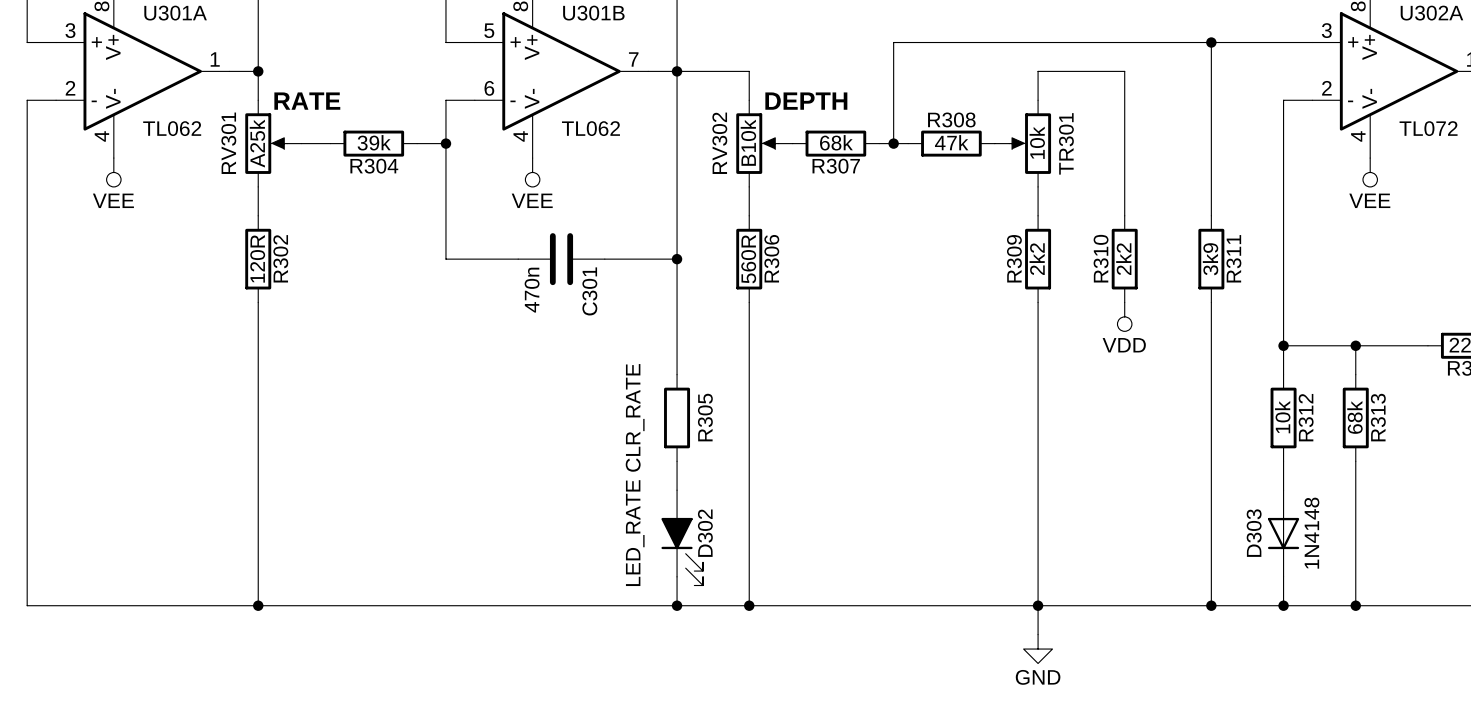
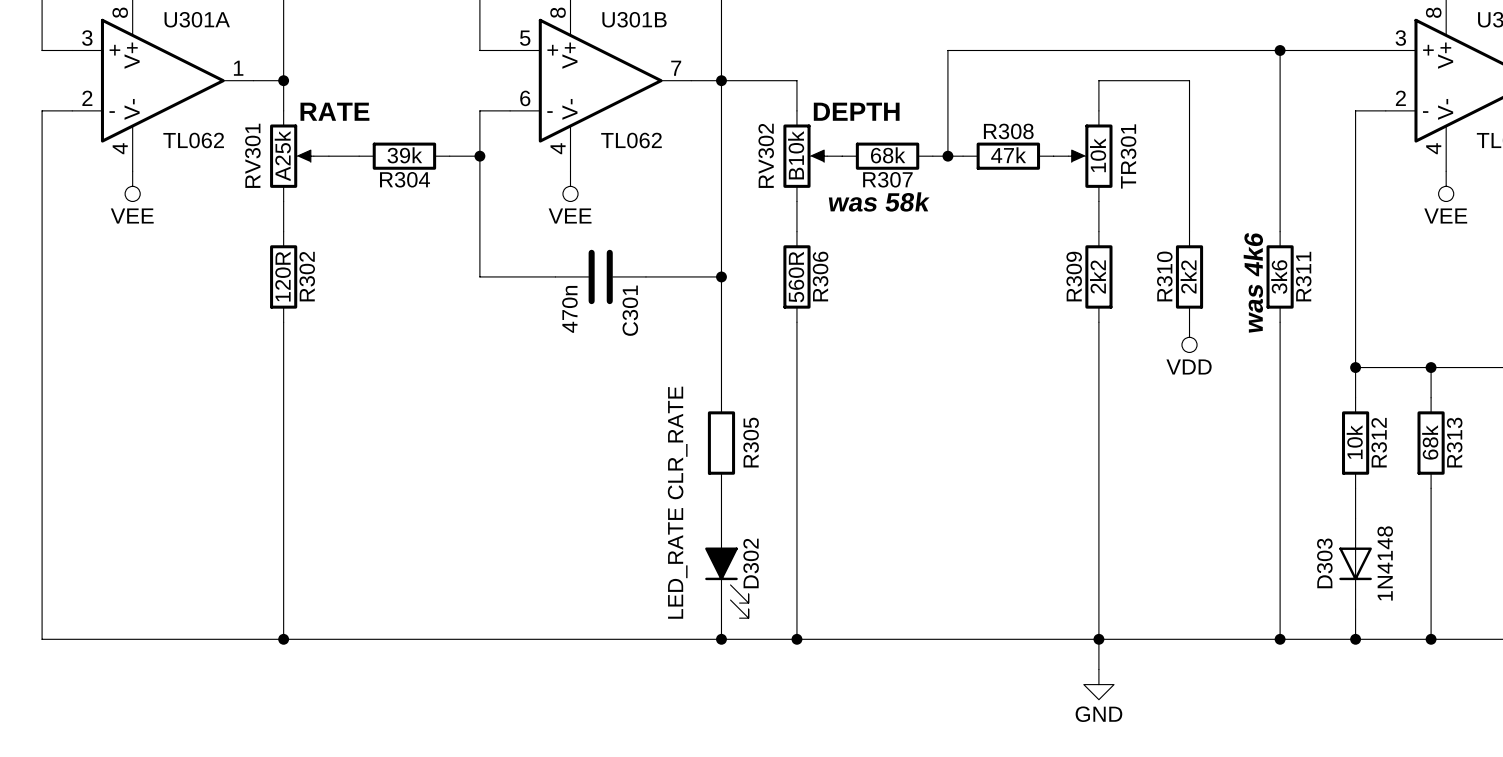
text: none -> was 58k (879, 201)
R311 value: 3k9 (1210, 259) -> 3k6 (1279, 277)
text: none -> was 4k6 (1253, 282)

